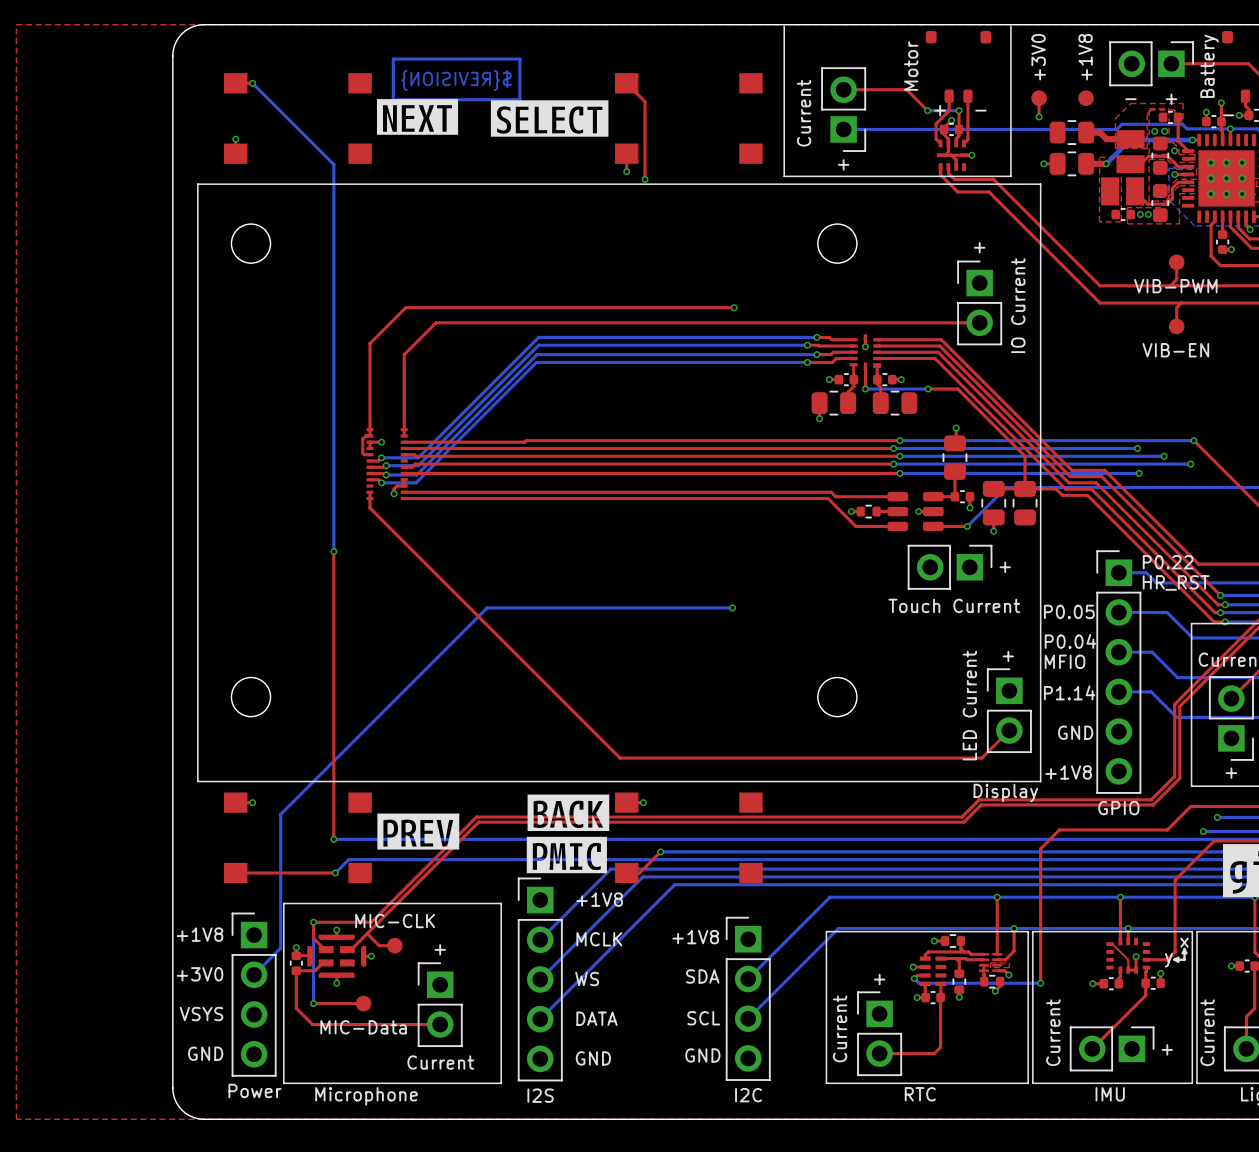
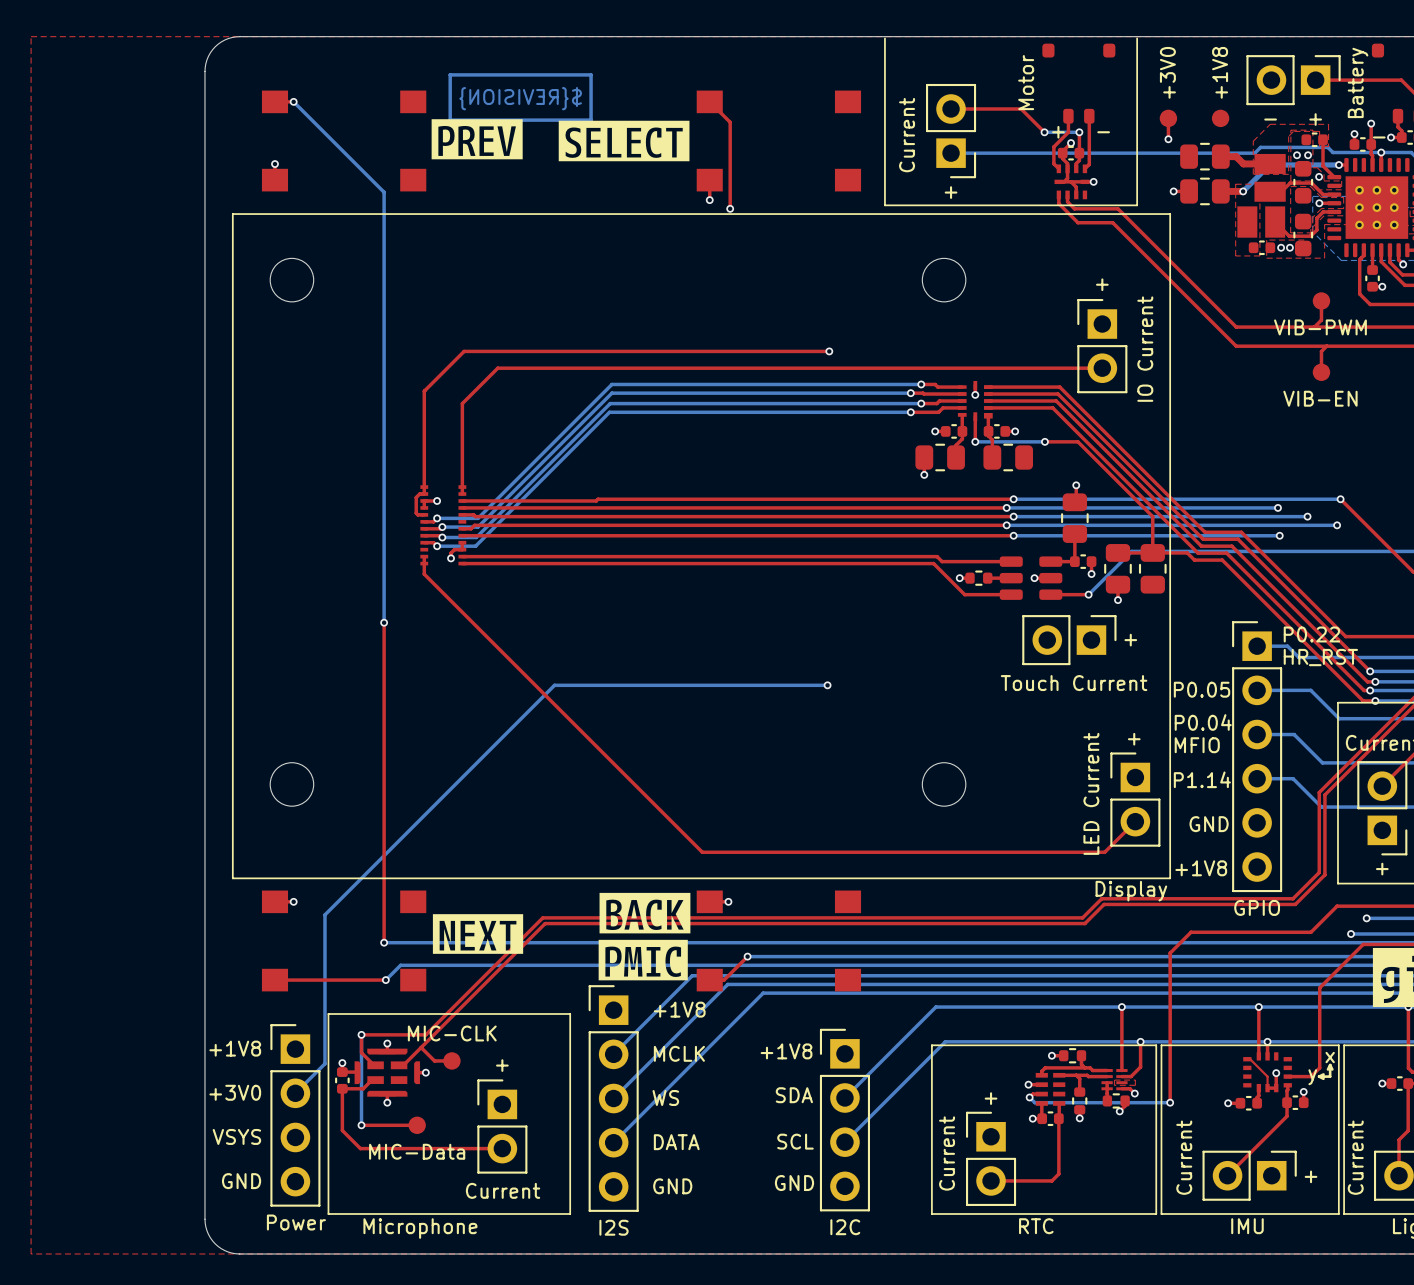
drawing shape: [376, 99, 459, 135] -> [431, 119, 523, 160]
drawing shape: [377, 813, 460, 850] -> [432, 914, 524, 954]

